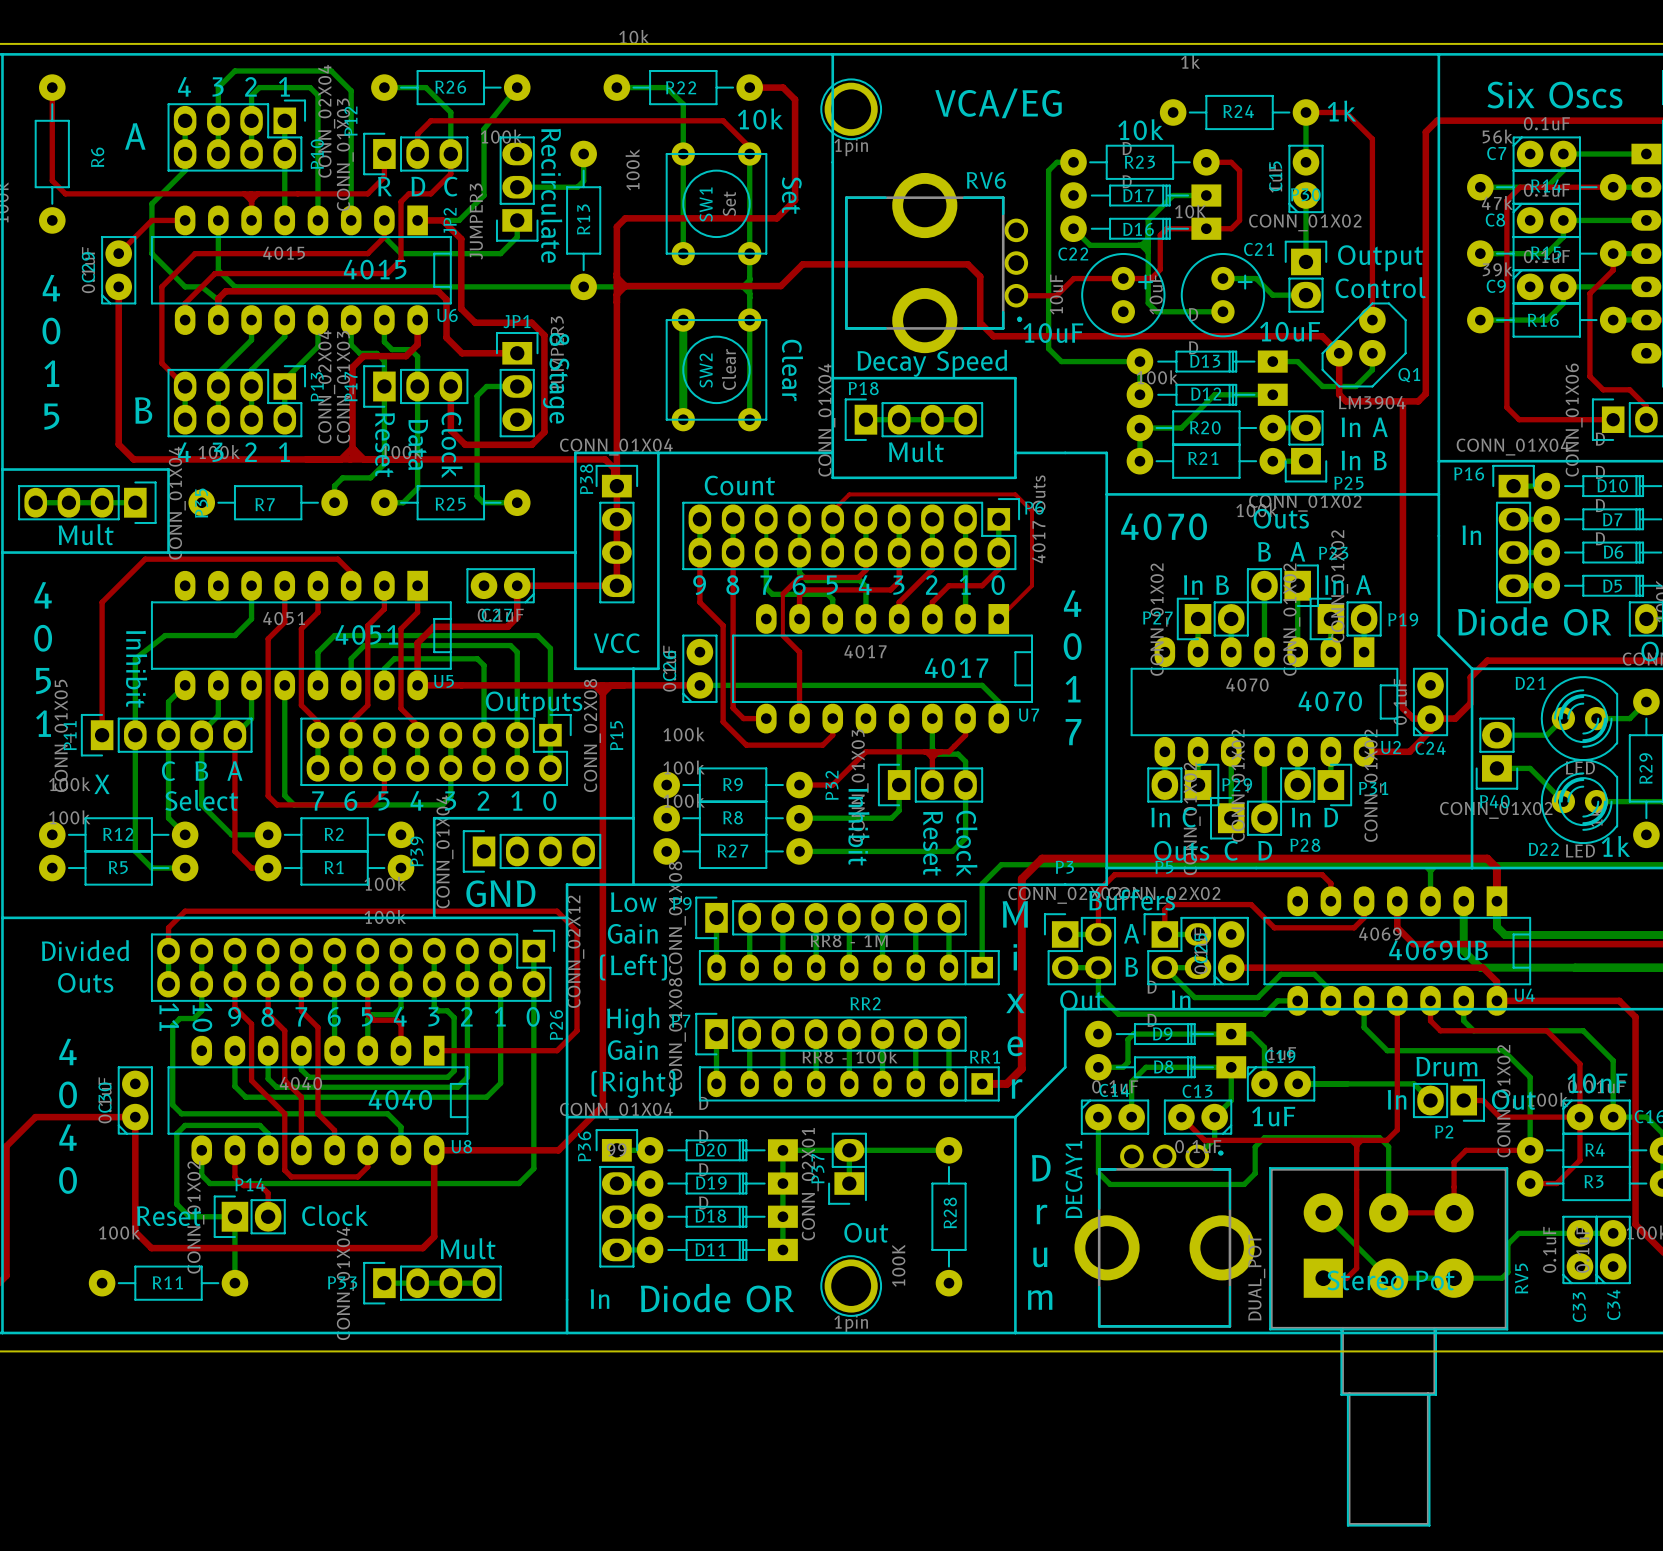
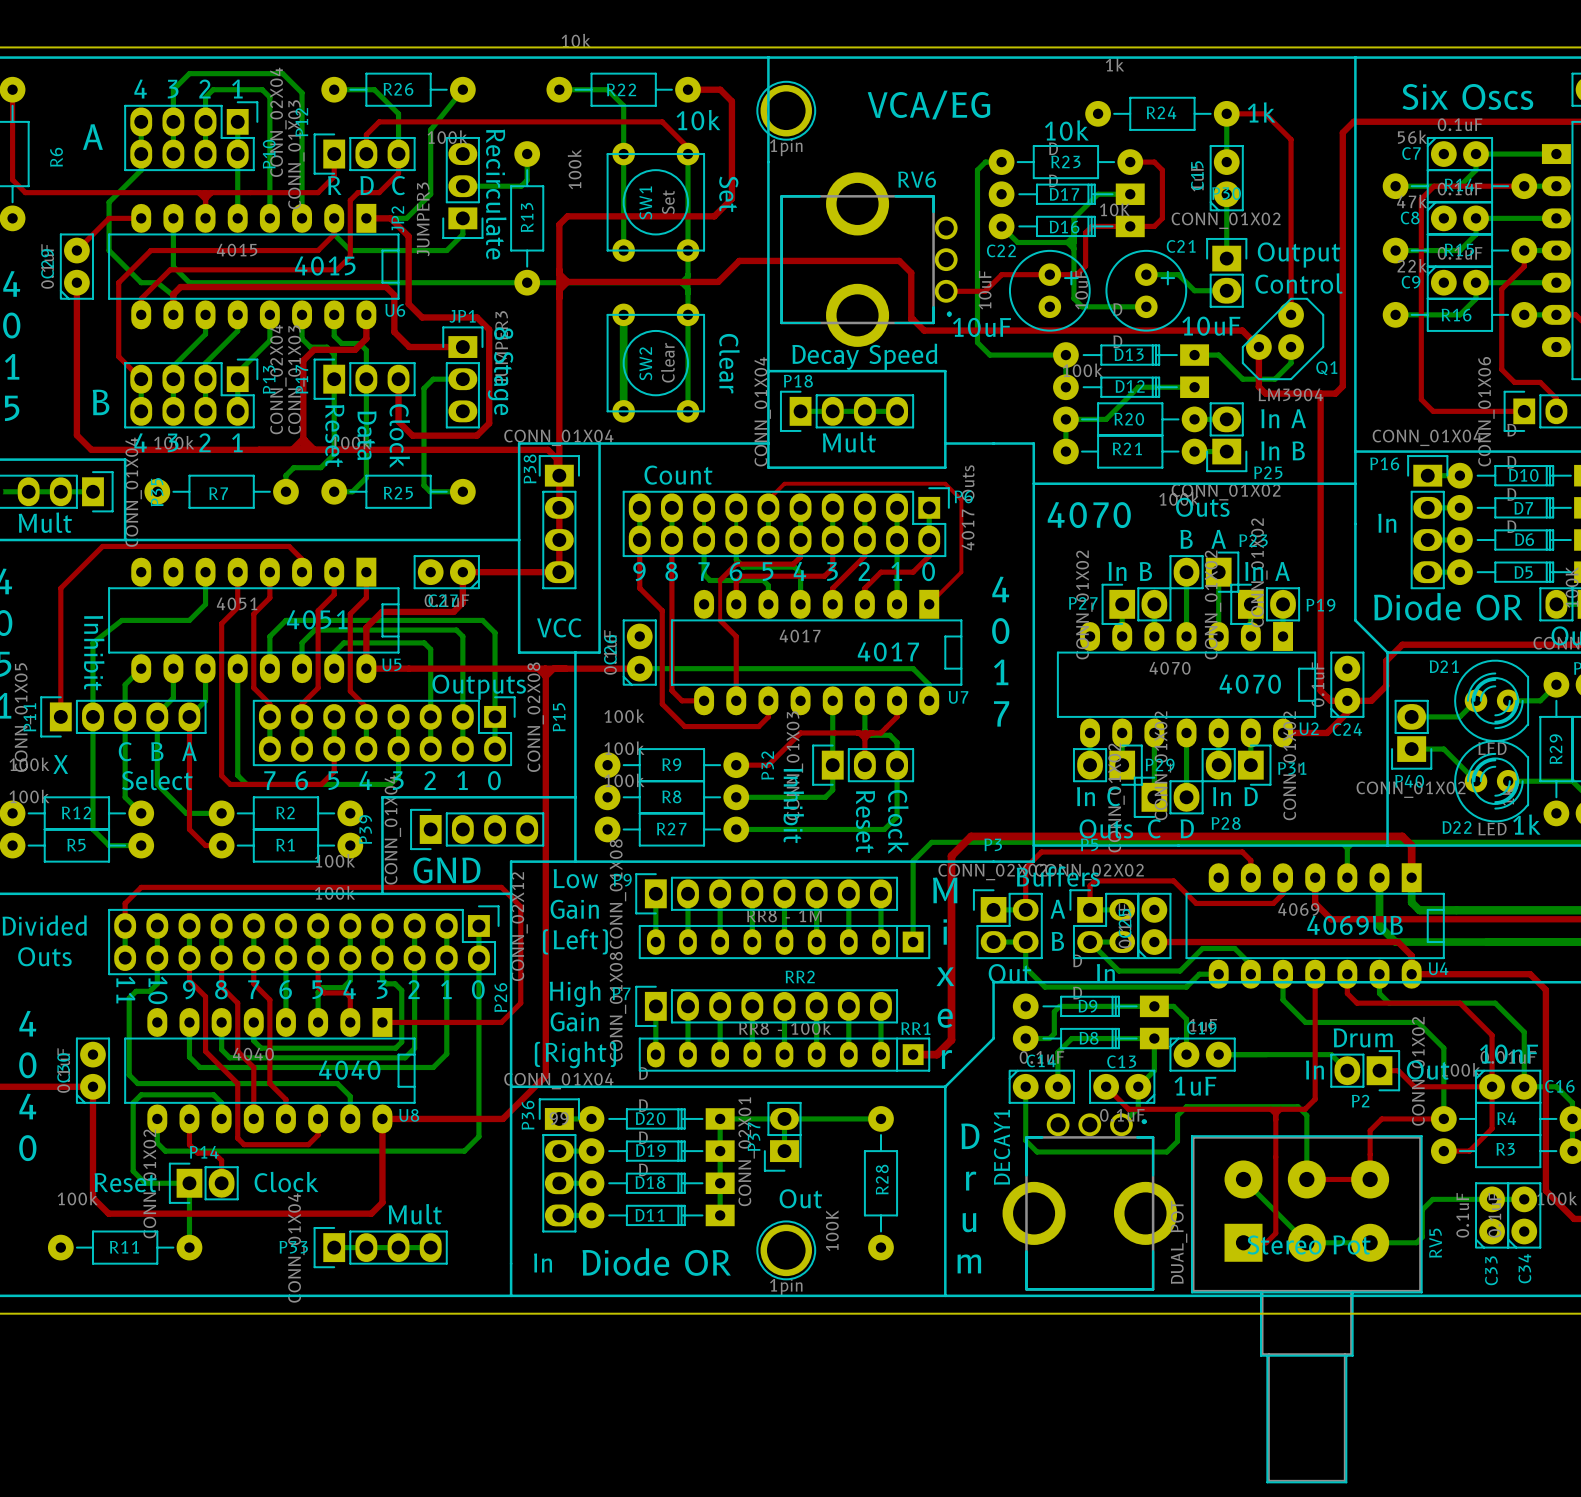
R16 value: 39k (1497, 269) -> 22k (1412, 265)

